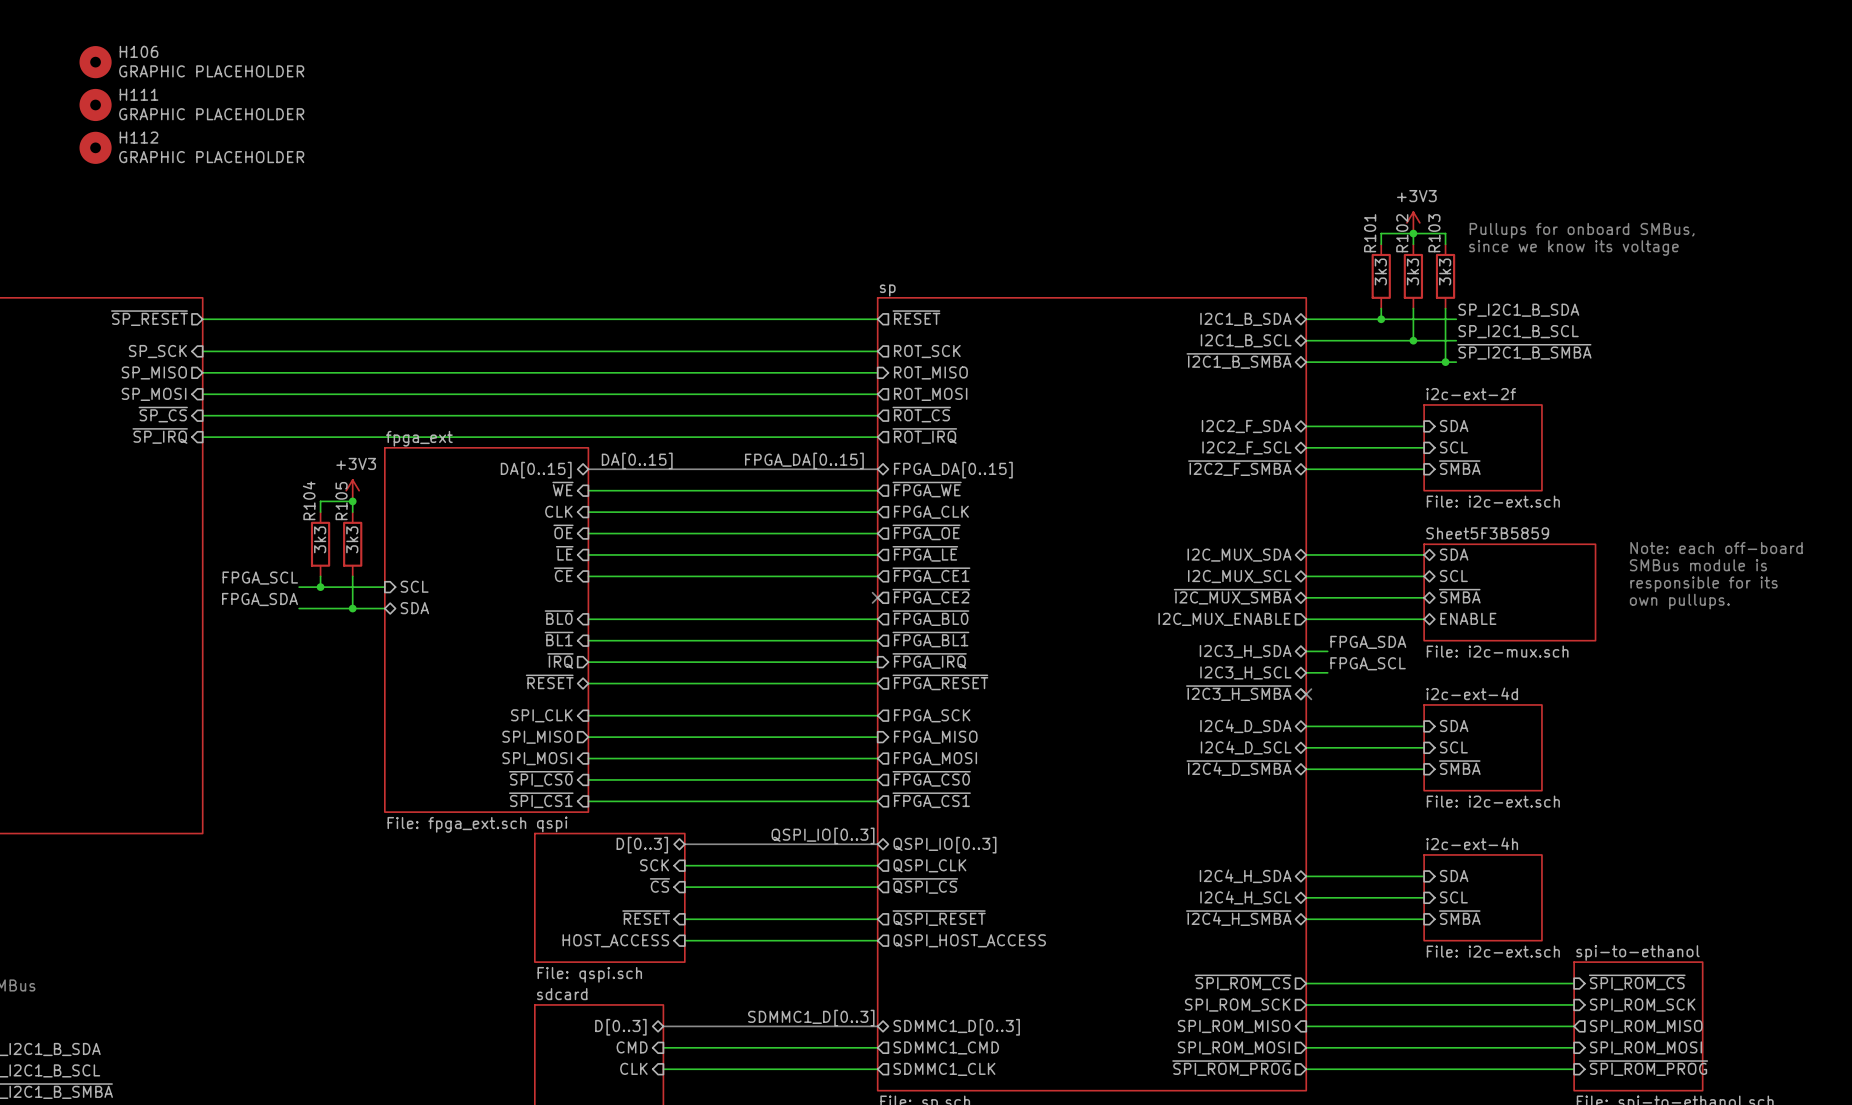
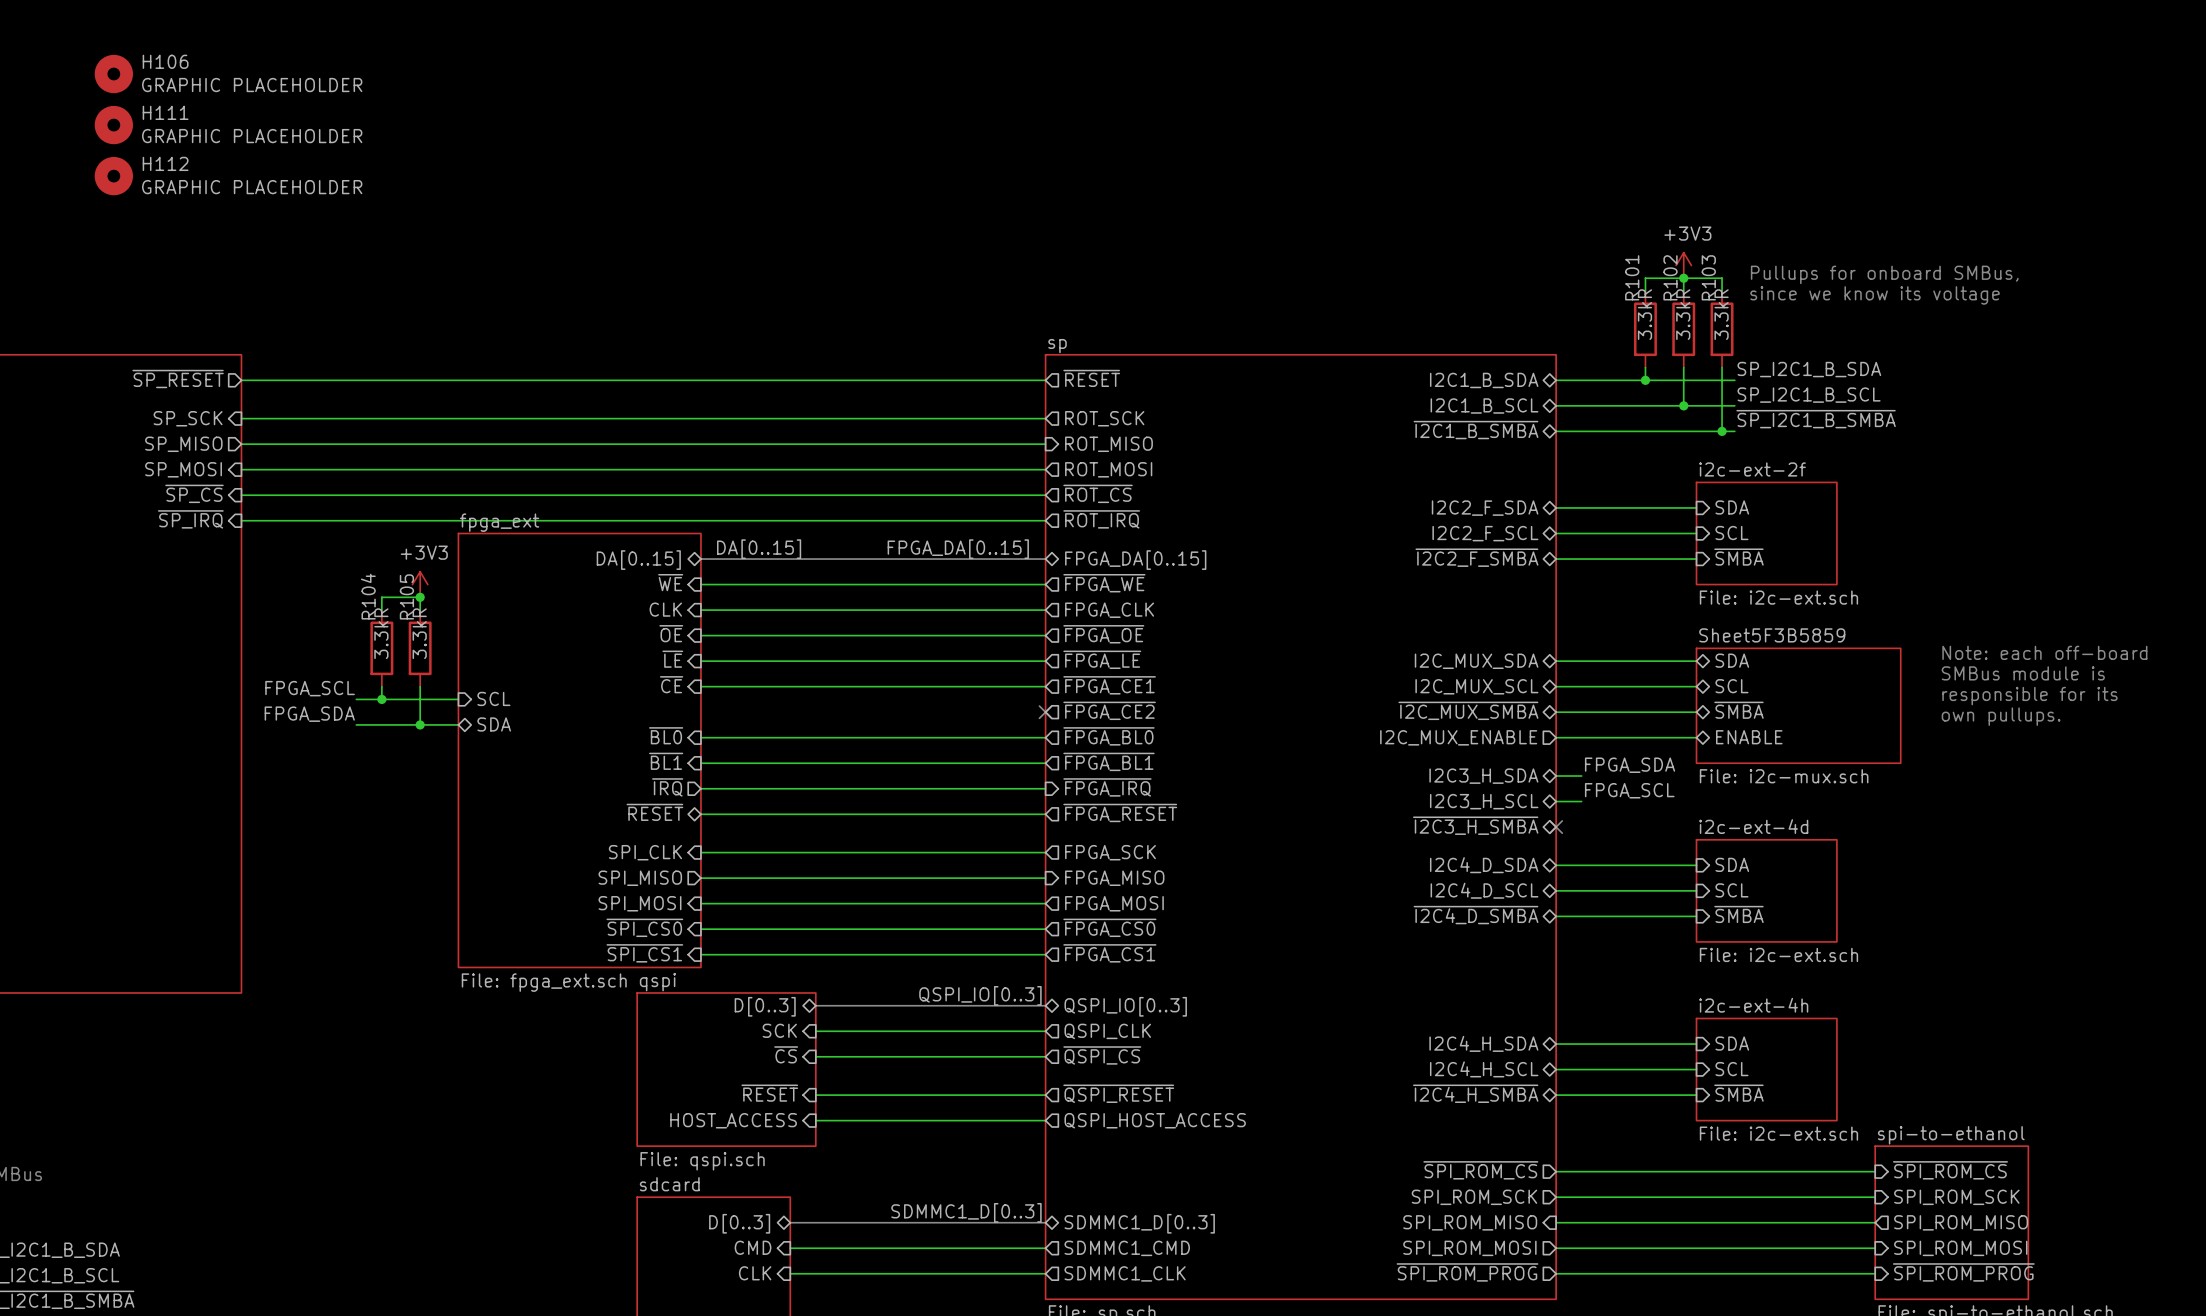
R101 value: 3k3 (1380, 271) -> 3.3kR (1644, 314)
R102 value: 3k3 (1412, 271) -> 3.3kR (1683, 314)
R103 value: 3k3 (1445, 271) -> 3.3kR (1721, 314)
R104 value: 3k3 (320, 539) -> 3.3kR (381, 633)
R105 value: 3k3 (352, 539) -> 3.3kR (419, 633)

